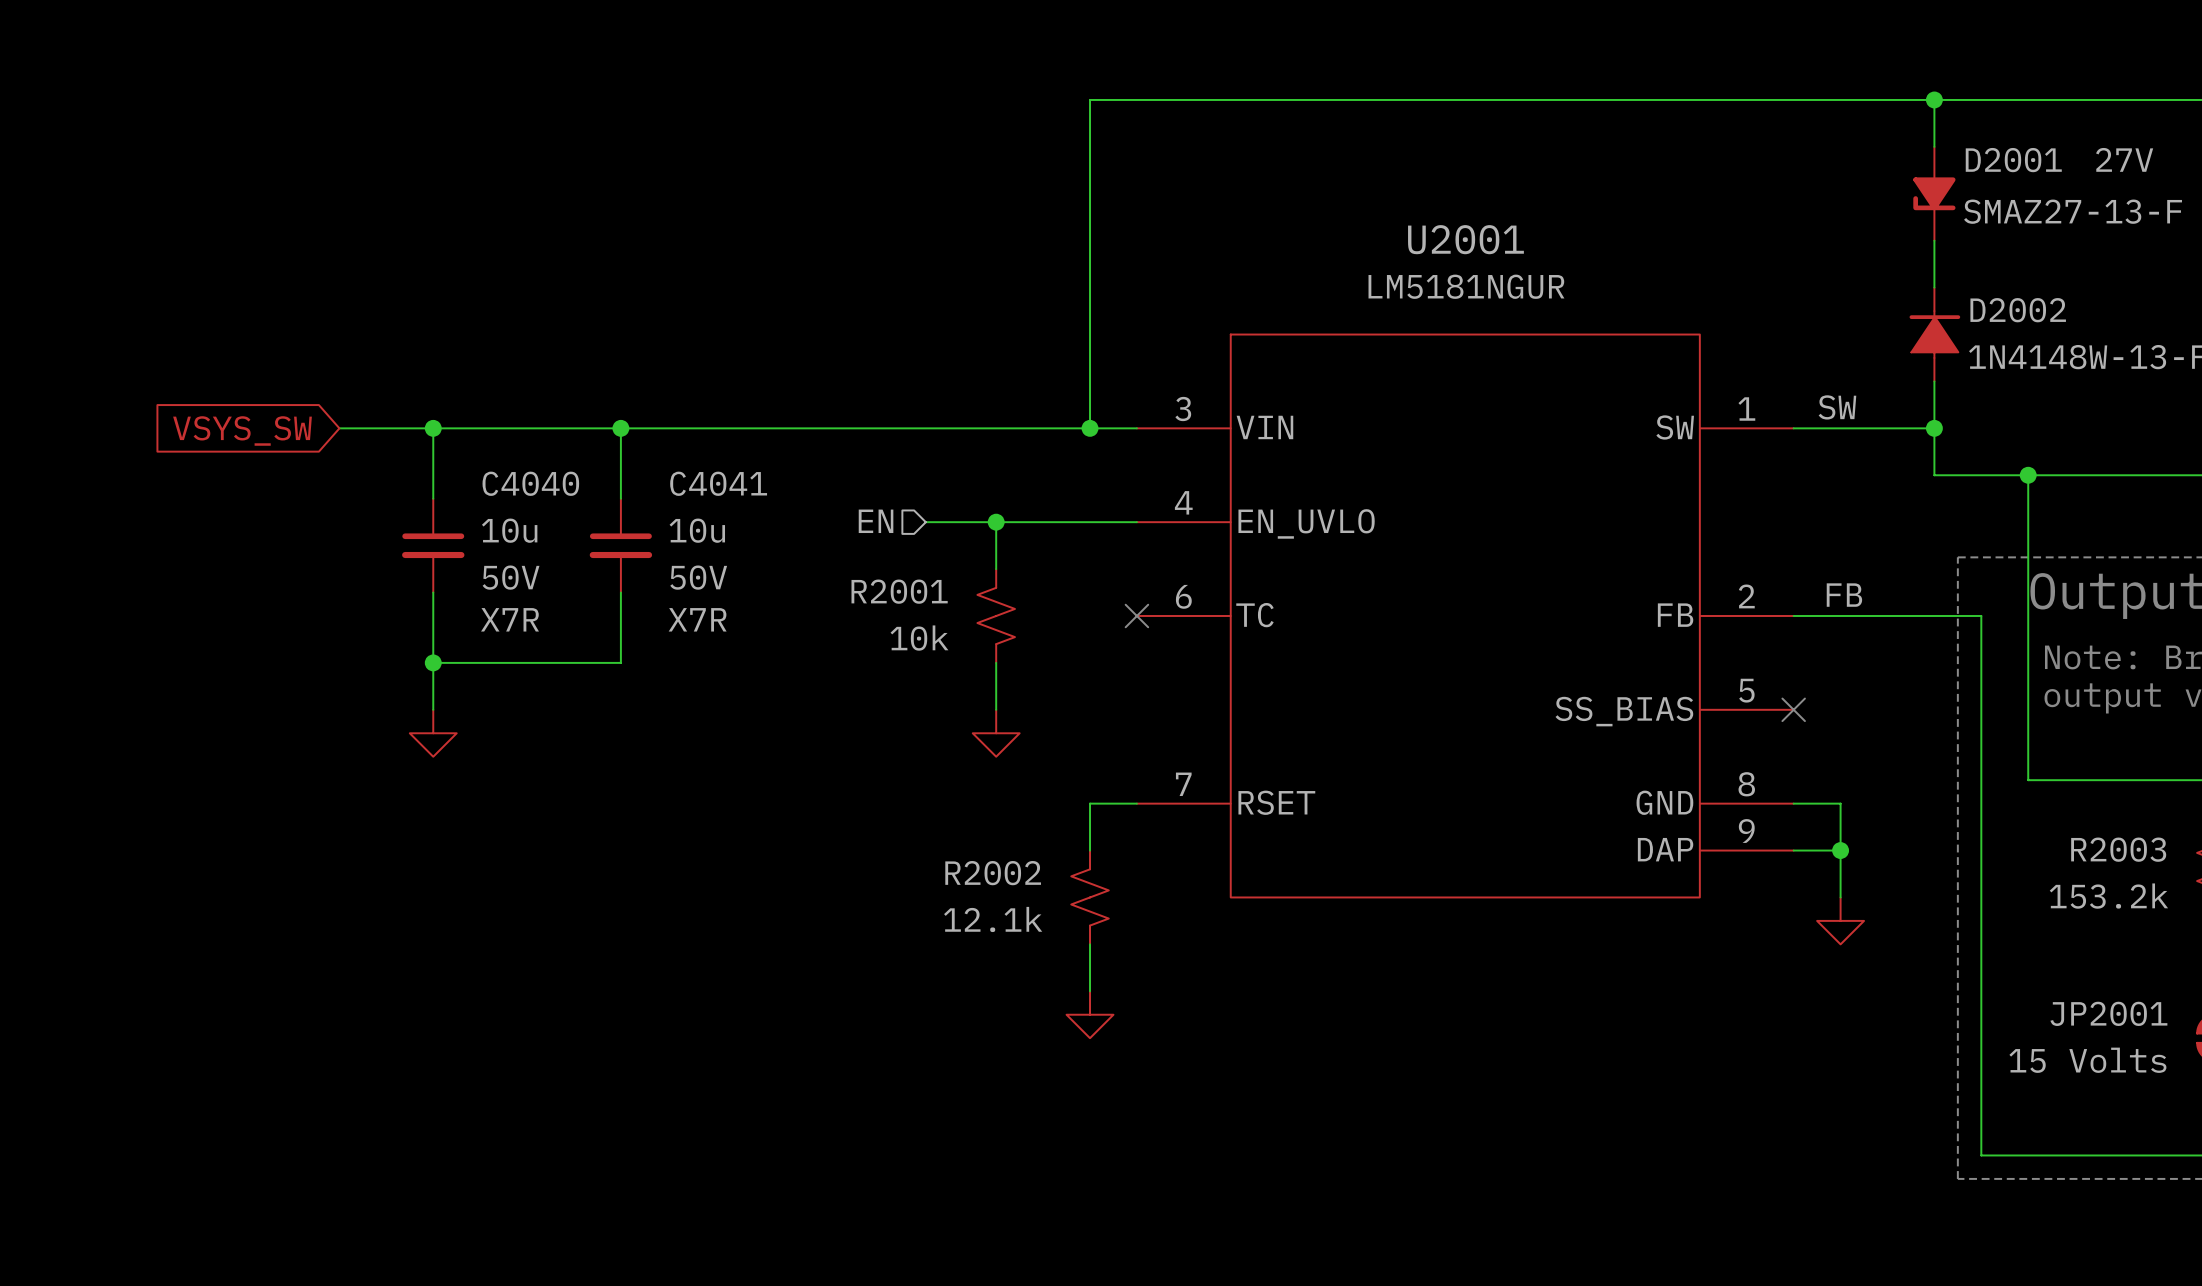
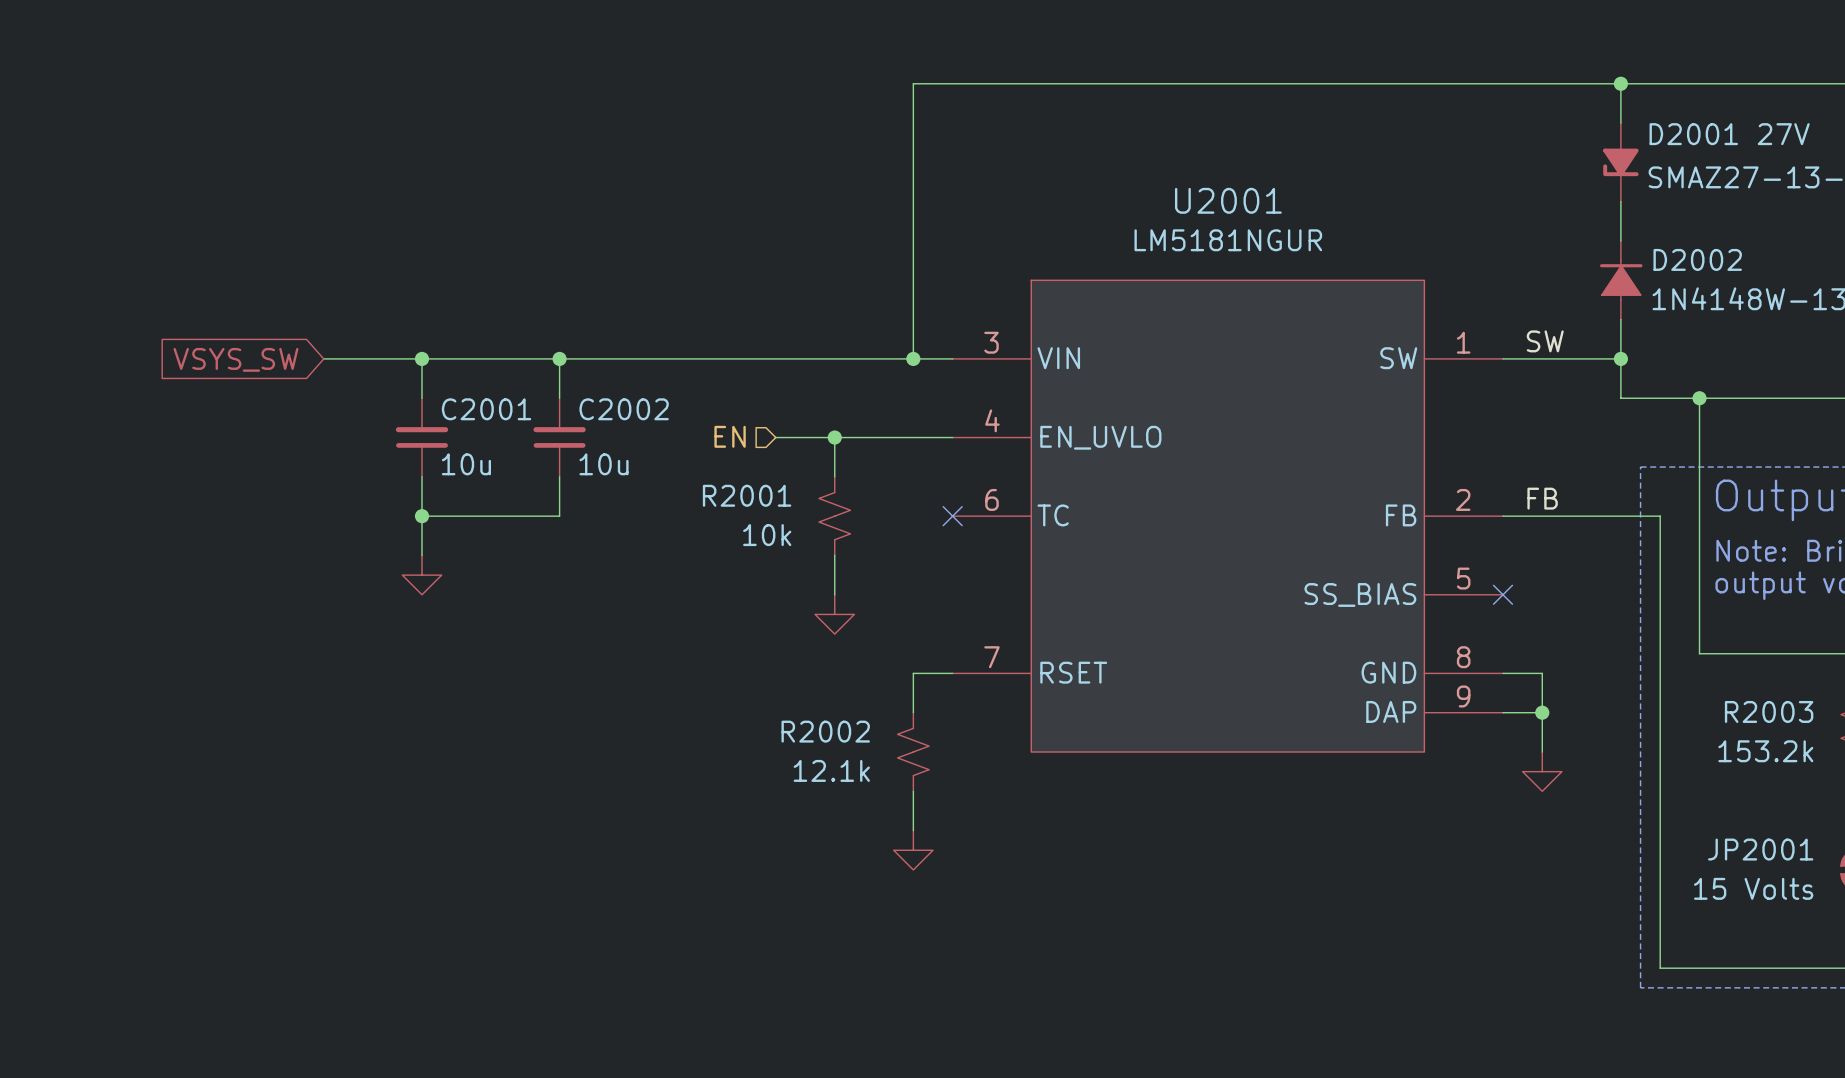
wire: (339, 428) (386, 428) -> none
wire: (433, 428) (433, 498) -> none
junction: (433, 428) -> none
wire: none -> (422, 358) (422, 398)
junction: none -> (422, 358)
wire: (620, 428) (620, 498) -> none
junction position: (620, 428) -> (559, 358)
wire: none -> (559, 358) (559, 398)
global label position: VSYS_SW (242, 430) -> VSYS_SW (235, 359)
C2001: none -> 10u (422, 437)
C2002: none -> 10u (559, 437)
C4040: 10u (433, 545) -> none
C4041: 10u (620, 545) -> none
wire: none -> (422, 476) (422, 555)
wire: none -> (559, 476) (559, 516) (422, 516)
wire: (433, 592) (433, 709) -> none
wire: (620, 592) (620, 662) (433, 662) -> none
junction position: (433, 662) -> (422, 516)
power symbol position: (433, 733) -> (422, 575)

